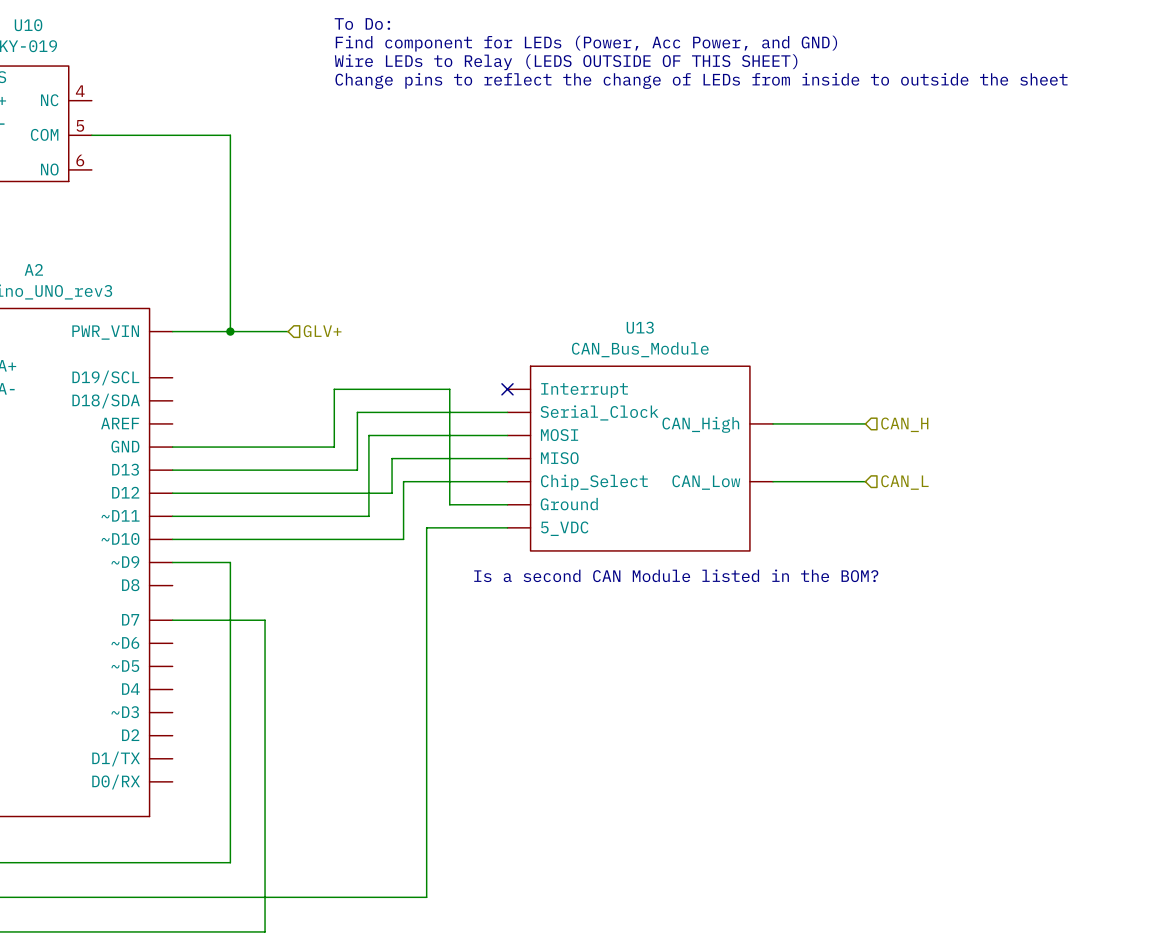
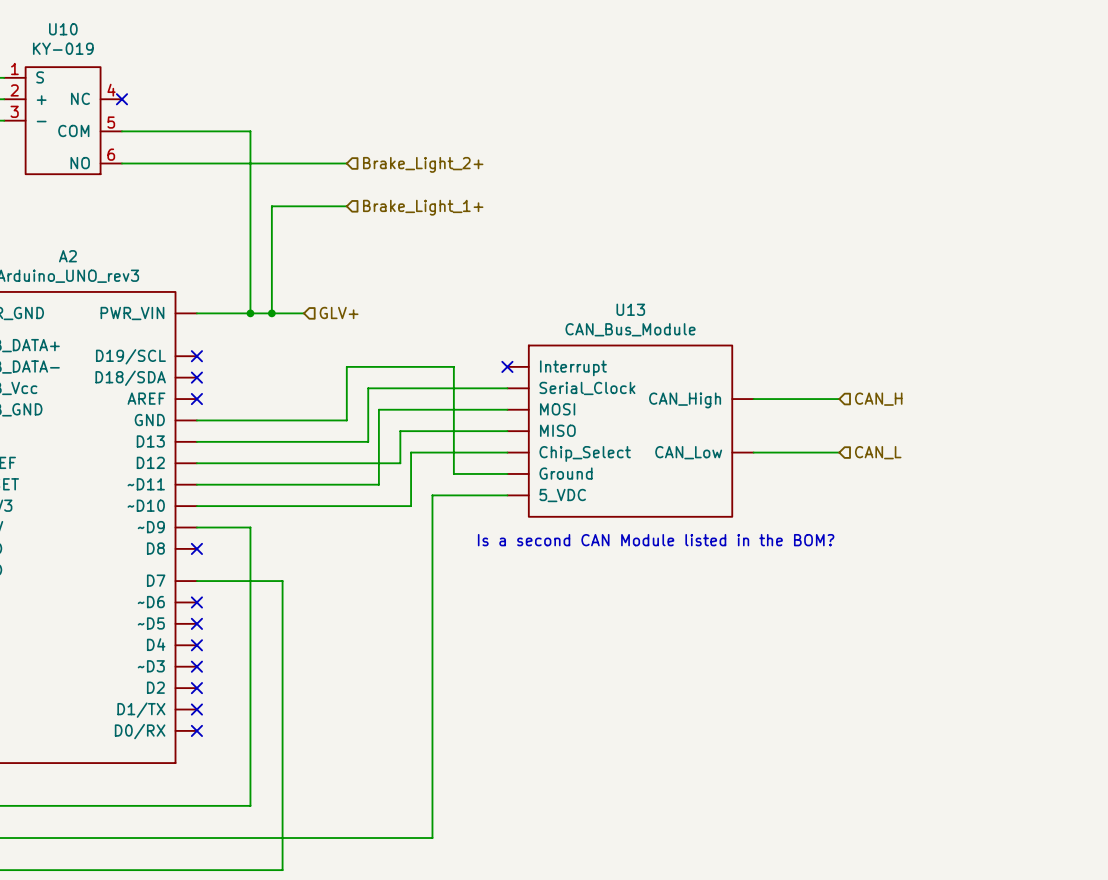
text: To Do: (362, 23) -> none
text: Find component for LEDs (Power, Acc Power, and GND) (586, 43) -> none
text: Wire LEDs to Relay (LEDS OUTSIDE OF THIS SHEET) (566, 62) -> none
text: Change pins to reflect the change of LEDs from inside to outside the sheet (701, 81) -> none
no-connect mark: none -> (121, 99)
wire: none -> (121, 163) (346, 163)
hierarchical label: none -> Brake_Light_2+ (423, 164)
wire: none -> (346, 206) (271, 206) (271, 313)
hierarchical label: none -> Brake_Light_1+ (423, 207)
junction: none -> (271, 313)
no-connect mark: none -> (196, 356)
no-connect mark: none -> (196, 377)
no-connect mark: none -> (196, 399)
no-connect mark: none -> (196, 548)
no-connect mark: none -> (196, 602)
no-connect mark: none -> (196, 623)
no-connect mark: none -> (196, 645)
no-connect mark: none -> (196, 666)
no-connect mark: none -> (196, 688)
no-connect mark: none -> (196, 709)
no-connect mark: none -> (196, 730)

